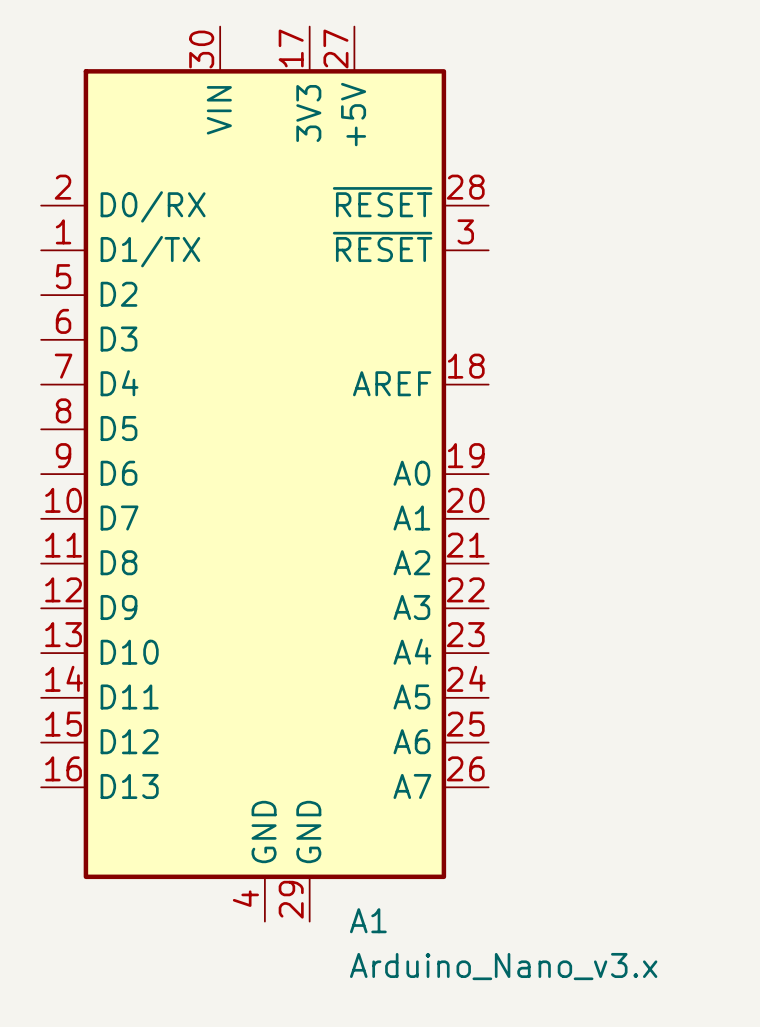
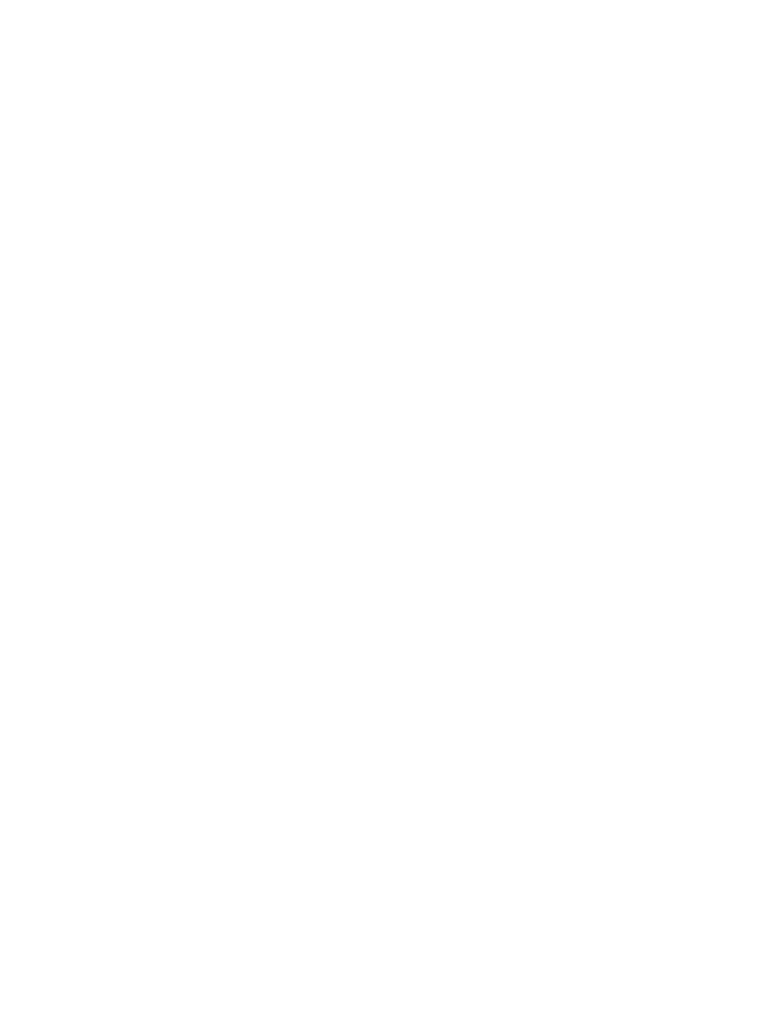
A1: Arduino_Nano_v3.x (264, 474) -> none

